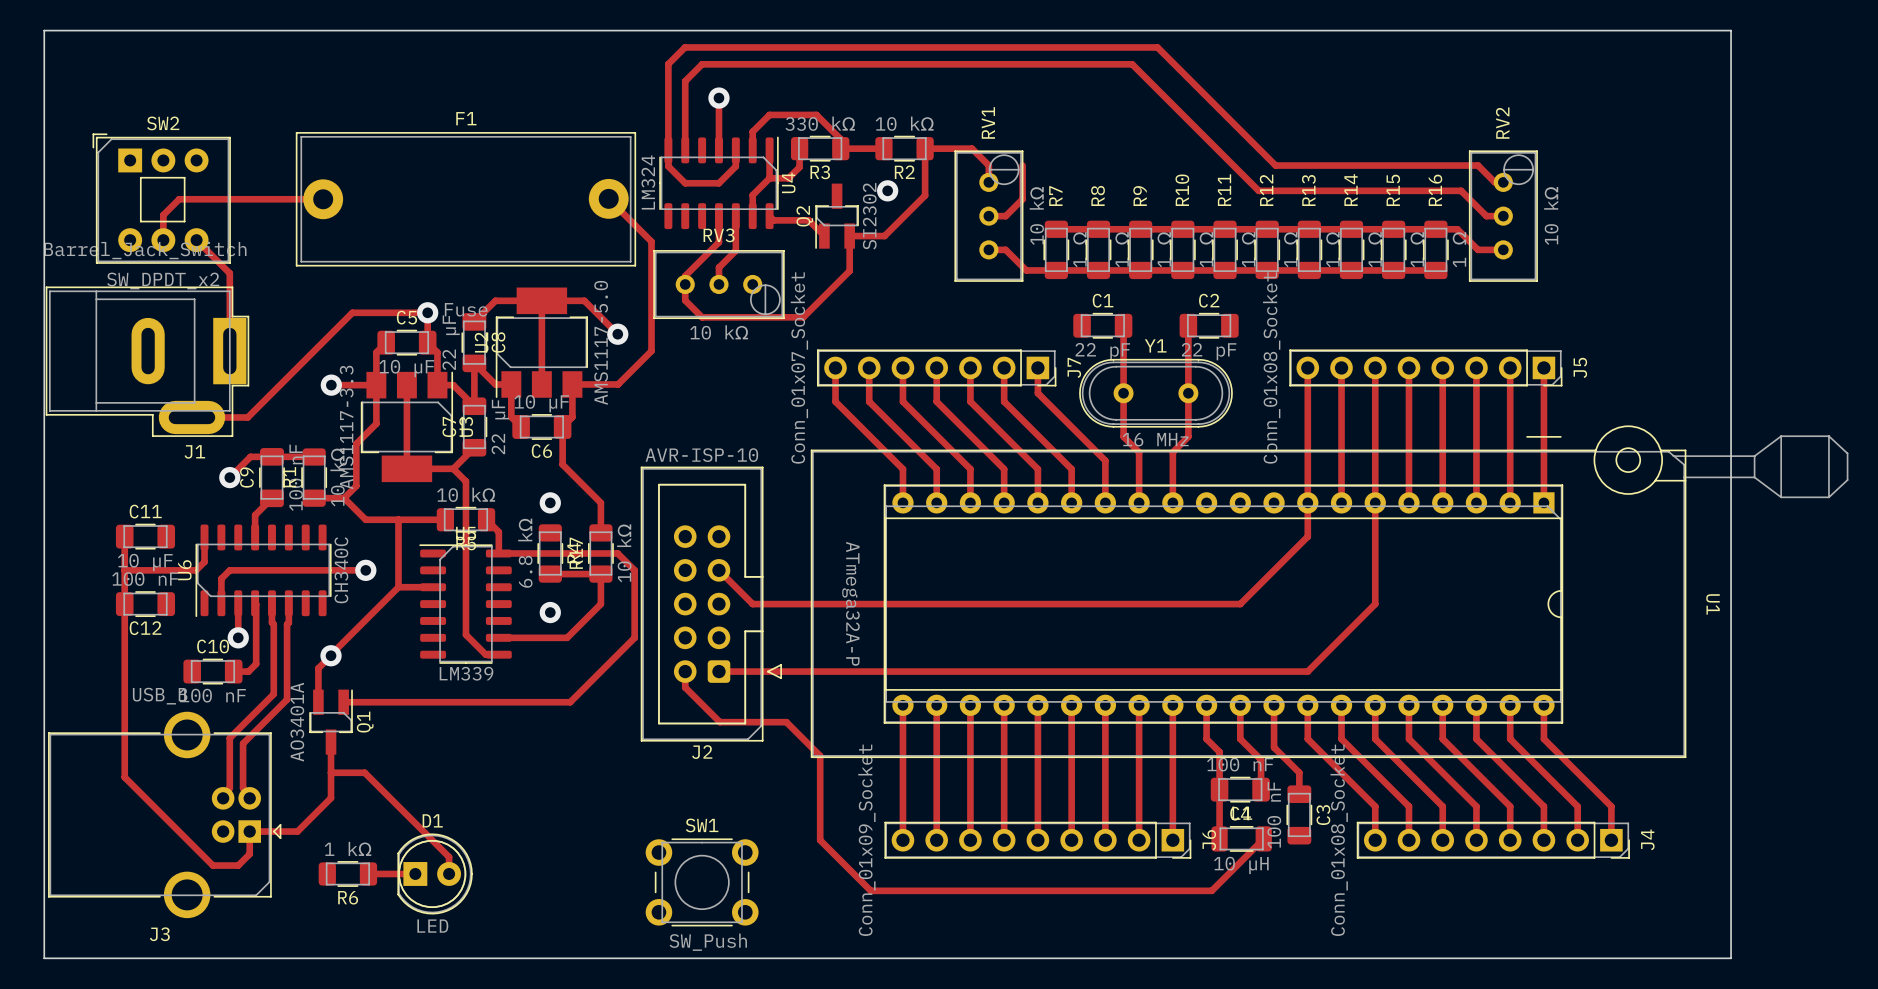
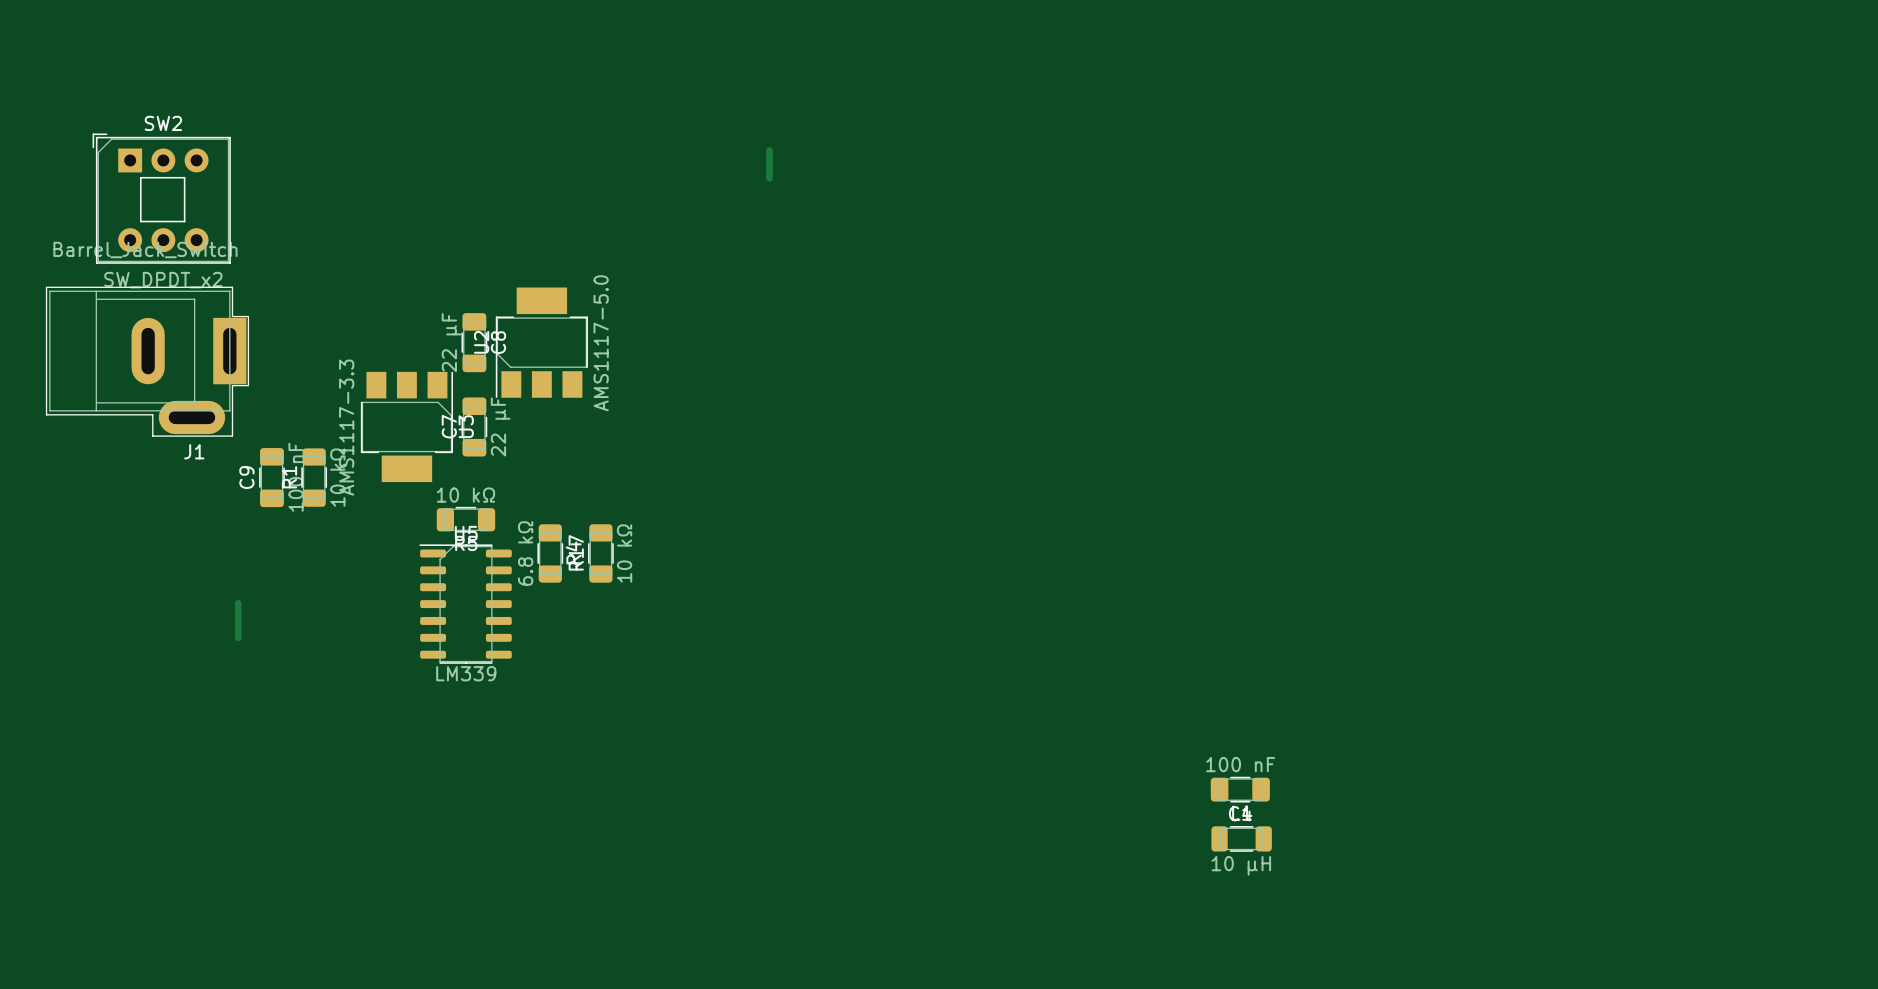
board edge: (44, 30) (1731, 30) (1731, 958) (44, 958) (44, 30) -> none
track: (718, 98) (718, 150) -> none
via: (718, 98) -> none
track: (799, 148) (799, 167) (788, 178) (769, 178) (752, 195) (752, 216) -> none
R3: 330 kΩ (820, 148) -> none
track: (883, 148) (840, 148) (840, 139) (816, 114) (769, 114) (752, 131) (752, 150) -> none
R2: 10 kΩ (904, 148) -> none
track: (685, 150) (685, 81) (702, 64) (1132, 64) (1258, 190) (1461, 190) (1486, 216) (1503, 216) -> none
track: (735, 150) (735, 166) (718, 183) (685, 183) (668, 166) (668, 64) (685, 47) (1157, 47) (1275, 165) (1478, 165) (1494, 182) (1503, 182) -> none
track: (1022, 165) (1022, 199) (1005, 216) (988, 216) -> none
U4: LM324 (718, 182) -> none
track: (988, 182) (988, 165) (971, 148) (925, 148) (925, 195) (884, 236) (849, 236) (849, 270) (803, 317) (702, 317) (685, 300) (685, 276) (718, 242) (718, 216) -> none
via: (887, 190) -> none
track: (608, 198) (651, 241) (651, 351) (618, 384) (572, 384) (572, 417) (562, 426) (562, 464) (600, 502) (600, 532) -> none
track: (323, 199) (179, 199) (163, 215) (163, 240) -> none
F1: Fuse (465, 199) -> none
track: (735, 216) (735, 250) (718, 267) (718, 284) -> none
track: (769, 216) (773, 220) (808, 220) (824, 236) -> none
Q2: SI2302 (837, 216) -> none
RV1: 10 kΩ (988, 216) -> none
RV2: 10 kΩ (1503, 216) -> none
track: (1056, 229) (1457, 229) (1478, 249) (1503, 249) -> none
track: (196, 240) (229, 273) (229, 351) -> none
track: (988, 249) (1005, 249) (1026, 270) (1435, 270) -> none
R7: 1 Ω (1056, 249) -> none
R8: 1 Ω (1098, 249) -> none
R9: 1 Ω (1140, 249) -> none
R10: 1 Ω (1182, 249) -> none
R11: 1 Ω (1225, 249) -> none
R12: 1 Ω (1267, 249) -> none
R13: 1 Ω (1309, 249) -> none
R14: 1 Ω (1351, 249) -> none
R15: 1 Ω (1393, 249) -> none
R16: 1 Ω (1435, 249) -> none
RV3: 10 kΩ (718, 284) -> none
track: (541, 300) (541, 384) -> none
via: (427, 312) -> none
track: (474, 321) (495, 300) (584, 300) (617, 334) -> none
C1: 22 pF (1102, 325) -> none
track: (1123, 325) (1123, 436) (1139, 452) (1139, 502) -> none
track: (1188, 325) (1188, 436) (1172, 452) (1172, 502) -> none
C2: 22 pF (1209, 325) -> none
via: (617, 334) -> none
track: (386, 342) (376, 352) (376, 423) (356, 443) (356, 486) (344, 498) -> none
C5: 10 µF (406, 342) -> none
track: (835, 367) (835, 401) (902, 469) (902, 502) -> none
track: (869, 367) (869, 401) (936, 469) (936, 502) -> none
track: (902, 367) (902, 401) (970, 469) (970, 502) -> none
track: (936, 367) (936, 401) (1004, 469) (1004, 502) -> none
J7: Conn_01x07_Socket (936, 367) -> none
track: (970, 367) (970, 401) (1037, 469) (1037, 502) -> none
track: (1004, 367) (1004, 401) (1071, 469) (1071, 502) -> none
track: (1037, 367) (1037, 393) (1105, 460) (1105, 502) -> none
track: (1307, 367) (1307, 536) (1240, 604) (752, 604) (718, 570) -> none
track: (1341, 367) (1341, 502) -> none
track: (1375, 367) (1375, 604) (1307, 671) (718, 671) -> none
track: (1408, 367) (1408, 502) -> none
J5: Conn_01x08_Socket (1425, 367) -> none
track: (1442, 367) (1442, 502) -> none
track: (1476, 367) (1476, 502) -> none
track: (1510, 367) (1510, 502) -> none
track: (1543, 367) (1543, 502) -> none
track: (331, 385) (376, 385) -> none
via: (331, 385) -> none
track: (406, 385) (406, 468) (453, 468) -> none
Y1: 16 MHz (1155, 393) -> none
track: (191, 417) (247, 417) (352, 312) (427, 312) (427, 342) (437, 352) (437, 385) (453, 385) (474, 406) (474, 363) (495, 384) (511, 384) (511, 417) (521, 426) -> none
C6: 10 µF (541, 426) -> none
track: (474, 447) (453, 468) -> none
track: (313, 456) (250, 456) (229, 477) -> none
track: (453, 468) (465, 481) (465, 634) (485, 654) (498, 654) -> none
via: (229, 477) -> none
track: (271, 498) (255, 515) (255, 537) -> none
track: (314, 498) (344, 498) -> none
track: (344, 498) (365, 519) (445, 519) -> none
via: (550, 502) -> none
track: (398, 519) (398, 587) -> none
track: (486, 519) (498, 532) (498, 553) (617, 553) (634, 570) (634, 637) (570, 702) (343, 702) -> none
track: (124, 536) (124, 777) (212, 865) (238, 865) (249, 854) (249, 831) (297, 831) (331, 798) (331, 742) -> none
C11: 10 µF (145, 536) -> none
track: (204, 537) (204, 561) (196, 570) (124, 570) -> none
U6: CH340C (263, 570) -> none
track: (365, 570) (229, 570) (221, 578) (221, 603) -> none
via: (365, 570) -> none
track: (550, 574) (600, 574) (600, 604) (567, 637) (498, 637) -> none
track: (398, 587) (318, 668) (318, 702) -> none
track: (398, 587) (433, 587) -> none
U1: ATmega32A-P (1329, 591) -> none
track: (255, 603) (256, 664) (248, 671) (233, 671) -> none
track: (271, 603) (273, 694) (229, 738) (229, 788) (228, 793) (223, 798) -> none
track: (288, 603) (287, 699) (243, 743) (243, 788) (244, 793) (249, 798) -> none
C12: 100 nF (145, 604) -> none
J2: AVR-ISP-10 (711, 604) -> none
via: (550, 612) -> none
via: (238, 637) -> none
via: (331, 655) -> none
C10: 100 nF (212, 671) -> none
track: (685, 671) (685, 687) (719, 722) (786, 722) (820, 755) (820, 840) (870, 890) (1211, 890) (1263, 838) -> none
track: (902, 705) (902, 840) -> none
track: (936, 705) (936, 840) -> none
track: (970, 705) (970, 840) -> none
track: (1004, 705) (1004, 840) -> none
track: (1037, 705) (1037, 840) -> none
track: (1071, 705) (1071, 840) -> none
track: (1105, 705) (1105, 840) -> none
track: (1139, 705) (1139, 840) -> none
track: (1172, 705) (1172, 840) -> none
track: (1206, 705) (1206, 739) (1219, 752) (1219, 838) -> none
track: (1240, 705) (1240, 739) (1261, 759) (1261, 789) -> none
track: (1274, 705) (1274, 747) (1299, 772) (1299, 794) -> none
track: (1307, 705) (1307, 739) (1375, 806) (1375, 840) -> none
track: (1341, 705) (1341, 739) (1408, 806) (1408, 840) -> none
track: (1375, 705) (1375, 739) (1442, 806) (1442, 840) -> none
track: (1408, 705) (1408, 739) (1476, 806) (1476, 840) -> none
track: (1442, 705) (1442, 739) (1510, 806) (1510, 840) -> none
track: (1476, 705) (1476, 739) (1543, 806) (1543, 840) -> none
track: (1510, 705) (1510, 739) (1577, 806) (1577, 840) -> none
track: (1543, 705) (1543, 739) (1611, 806) (1611, 840) -> none
Q1: AO3401A (331, 722) -> none
track: (331, 772) (364, 772) (449, 857) (449, 873) -> none
J3: USB_B (164, 814) -> none
C3: 100 nF (1299, 814) -> none
J6: Conn_01x09_Socket (1037, 840) -> none
J4: Conn_01x08_Socket (1493, 840) -> none
R6: 1 kΩ (347, 873) -> none
track: (368, 873) (415, 873) -> none
D1: LED (435, 873) -> none
SW1: SW_Push (702, 882) -> none

